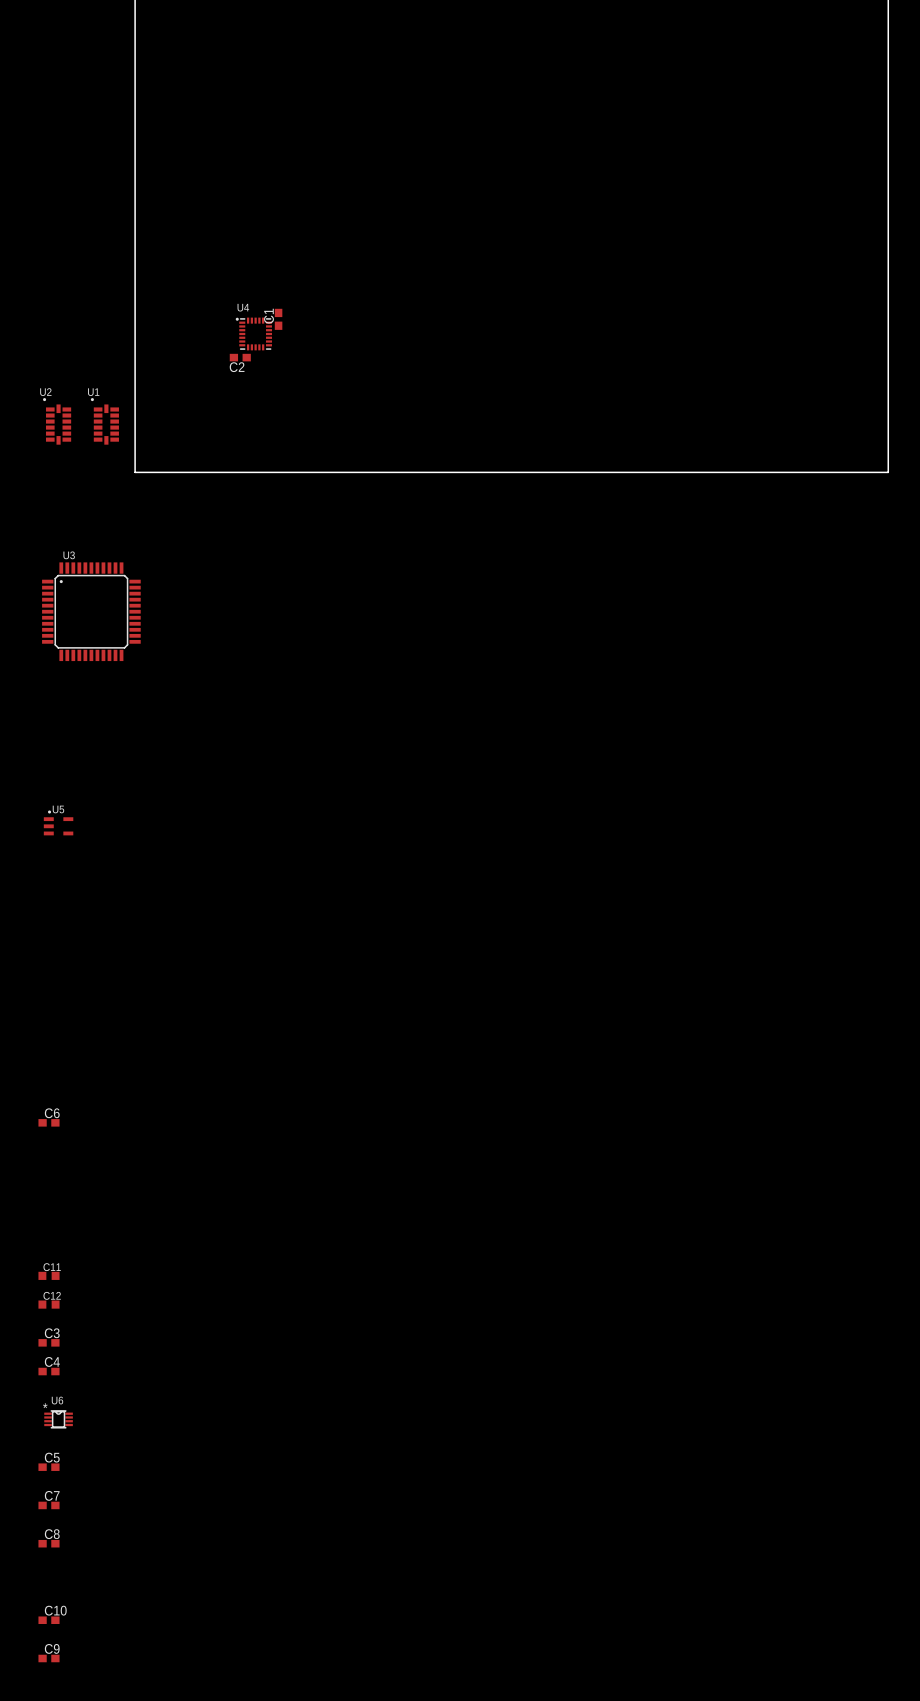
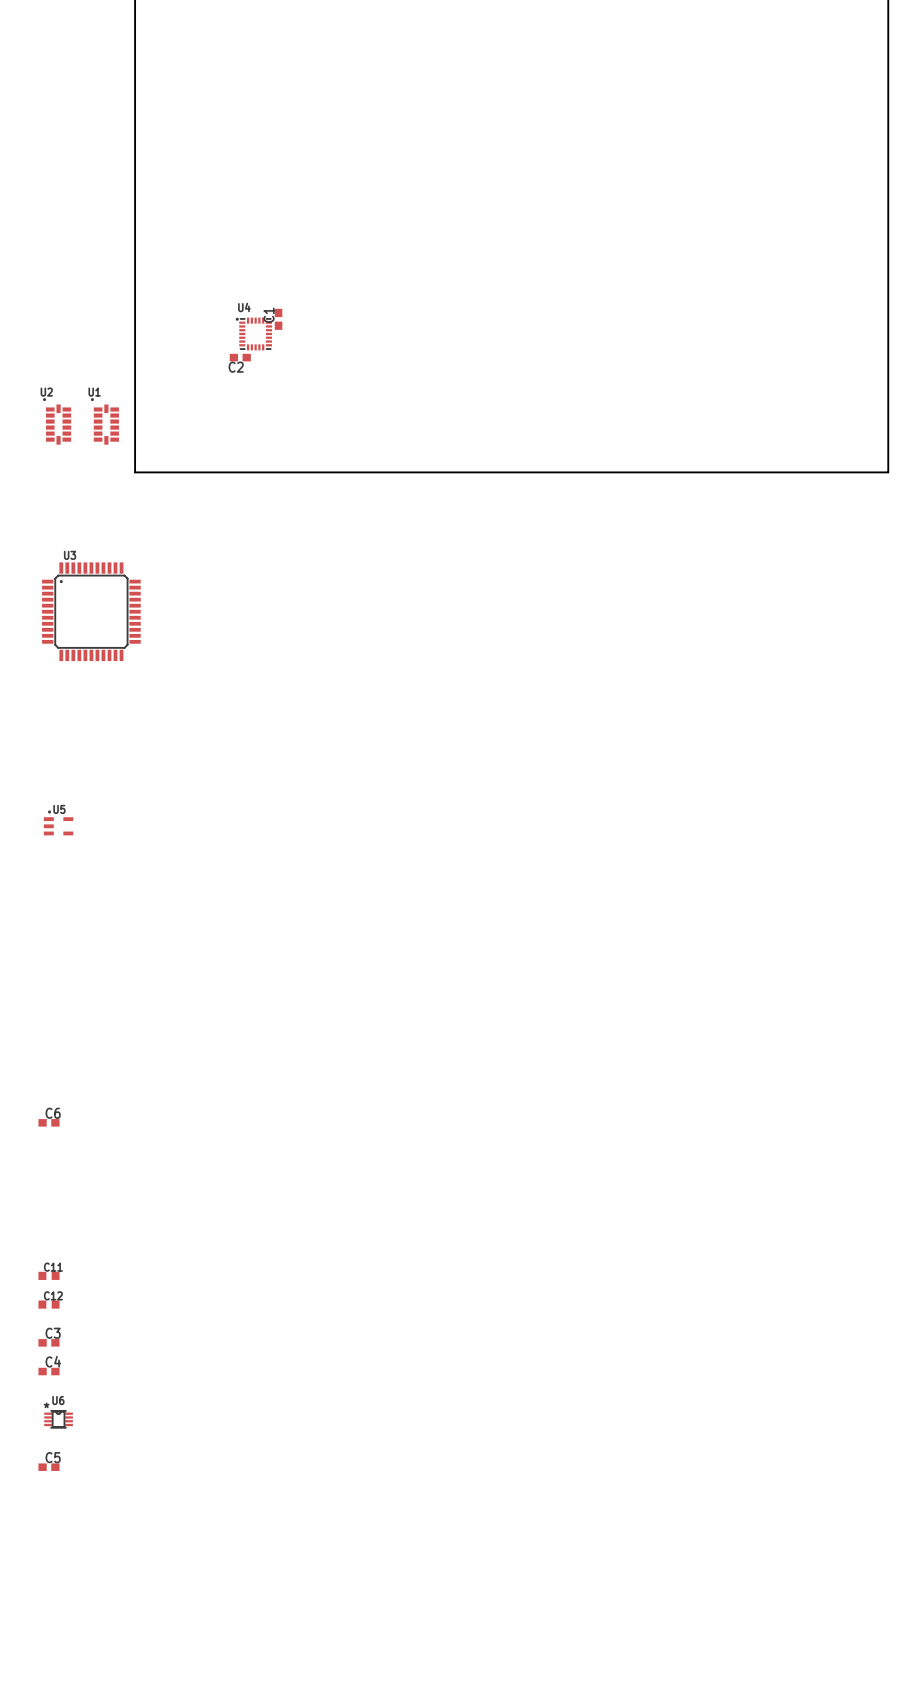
C7: (49, 1505) -> none
C8: (49, 1543) -> none
C10: (49, 1620) -> none
C9: (49, 1658) -> none

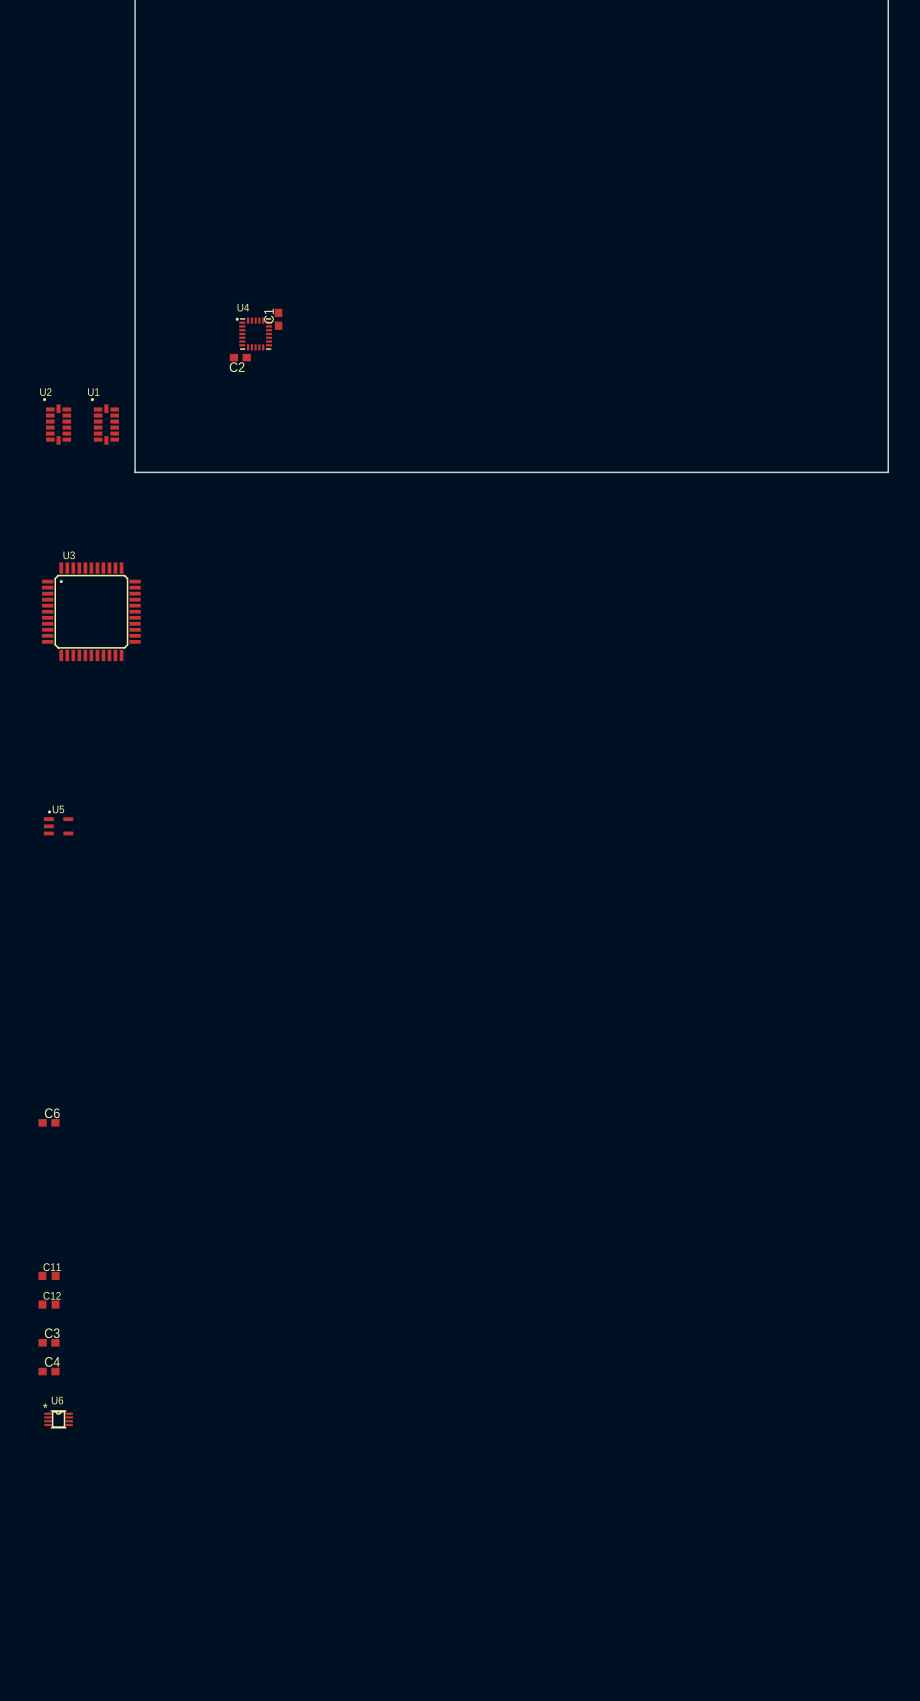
C5: (49, 1467) -> none

